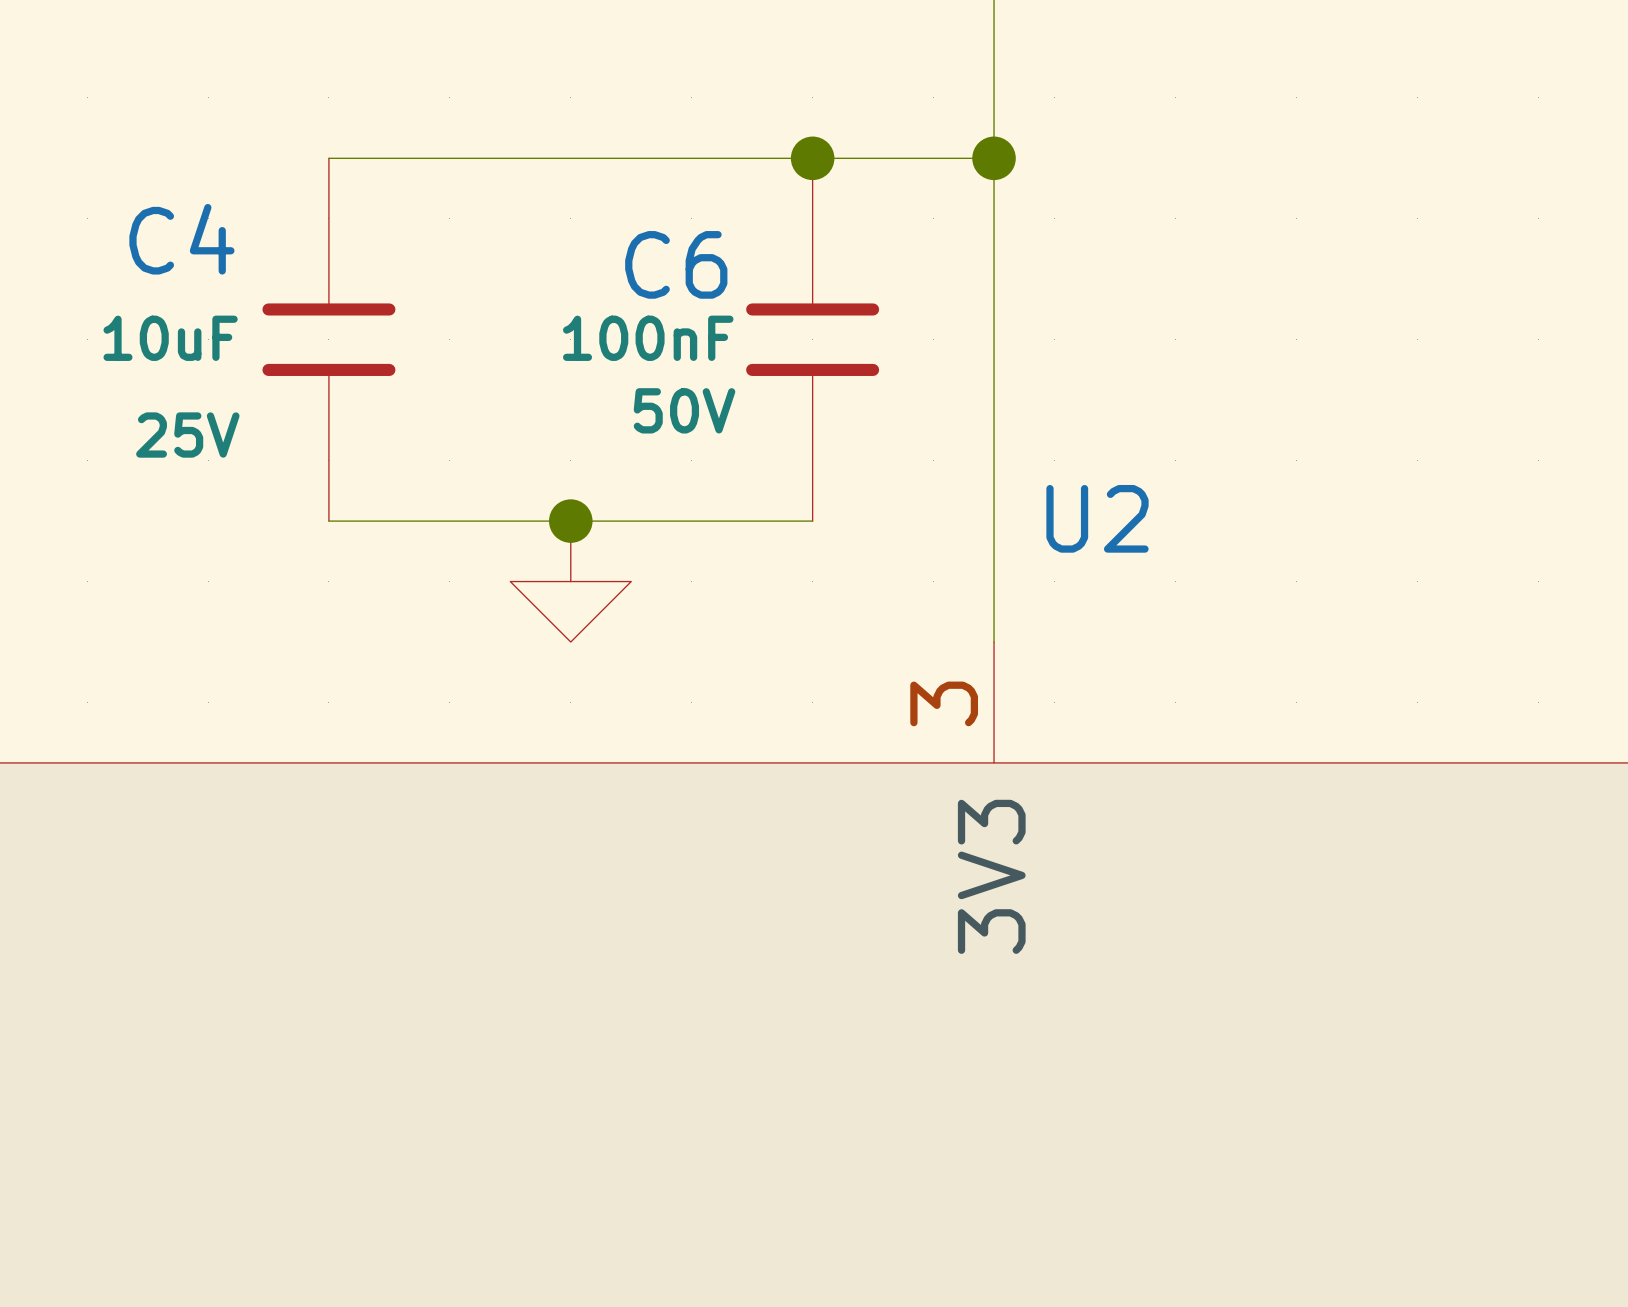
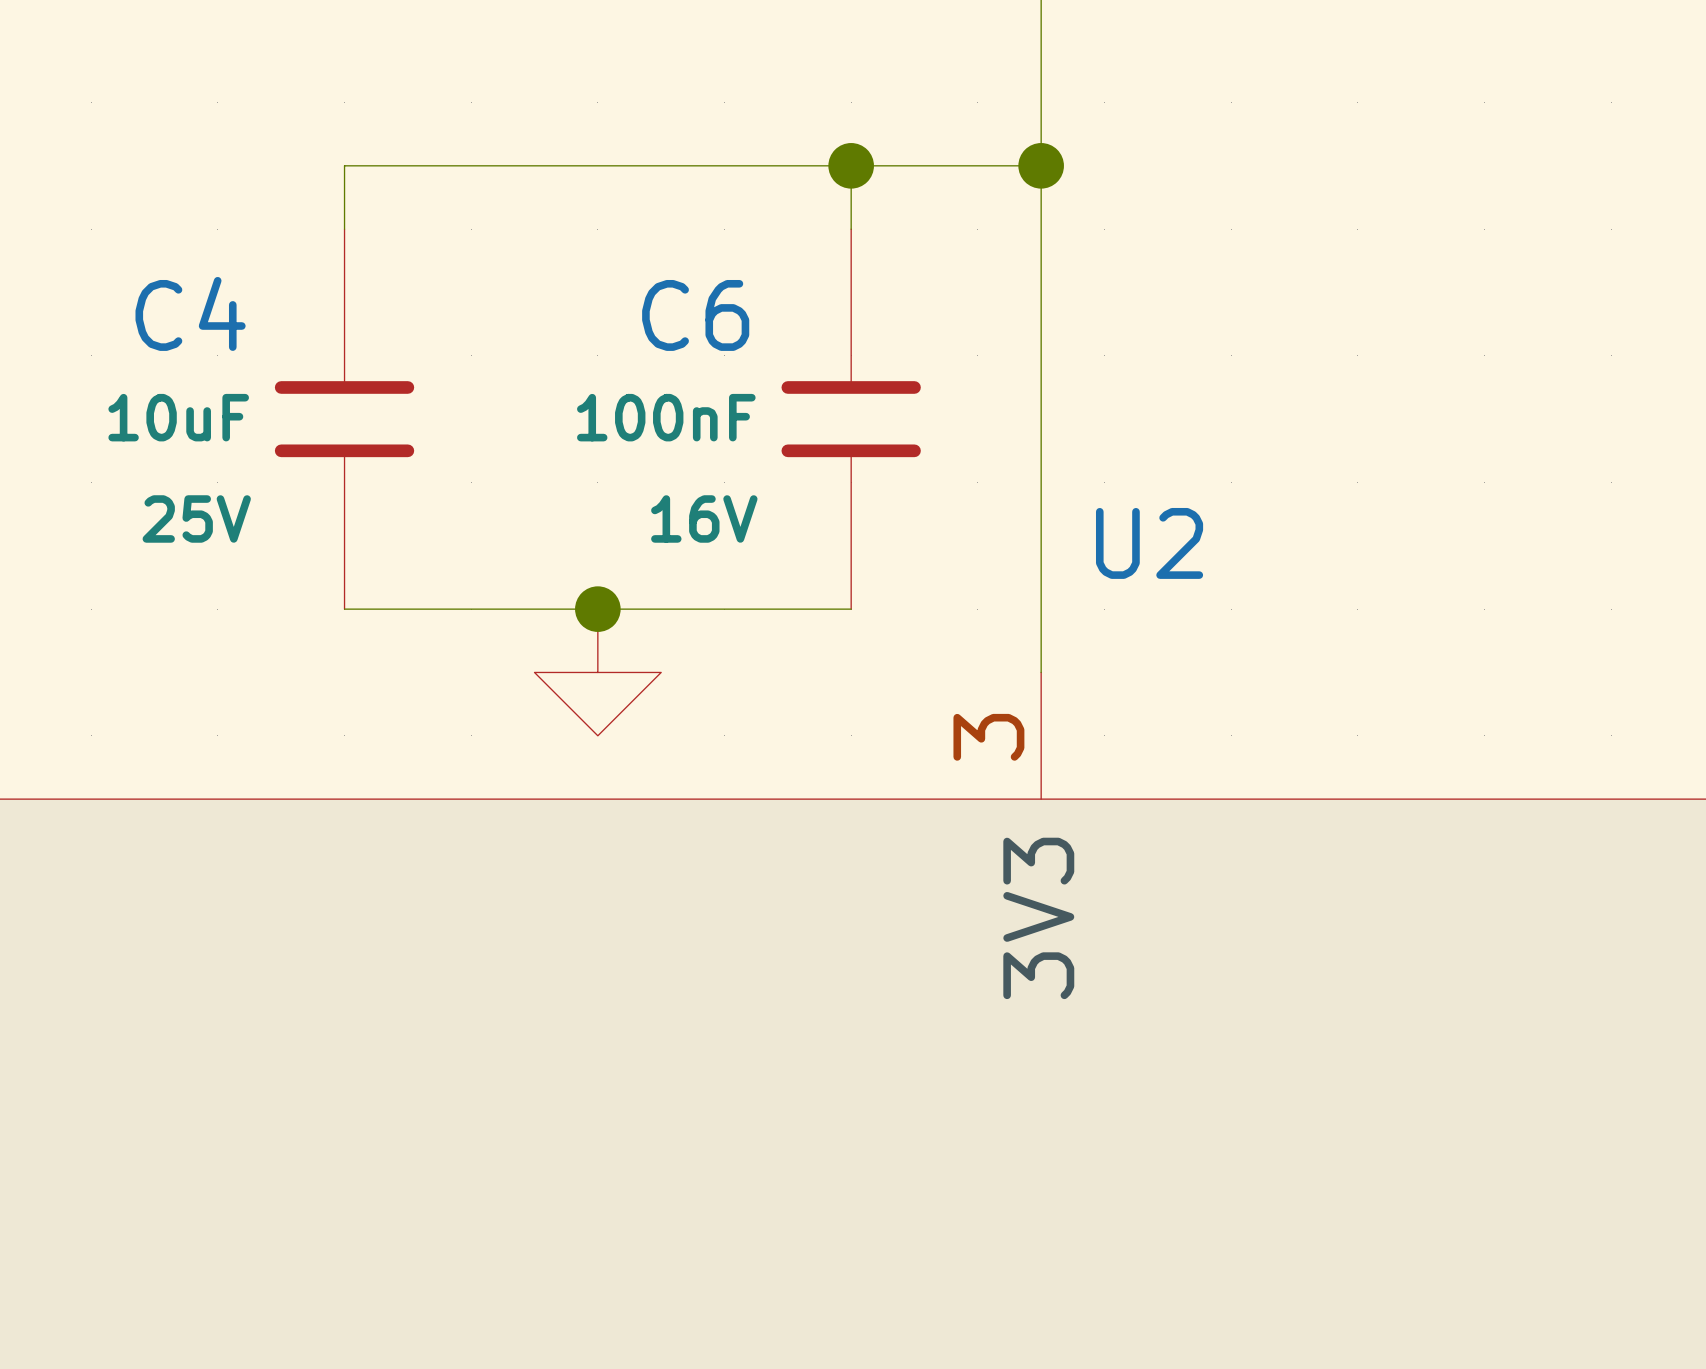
C6 name position: C6 (676, 264) -> C6 (695, 315)
C6 value position: 100nF (648, 338) -> 100nF (666, 417)
C4 position: (328, 339) -> (344, 419)
C6 position: (812, 339) -> (851, 419)
C6 text: 50V (684, 410) -> 16V (704, 518)
wire: (328, 521) (812, 521) -> (344, 609) (851, 609)
junction position: (570, 521) -> (597, 609)
power symbol position: (570, 581) -> (597, 672)

